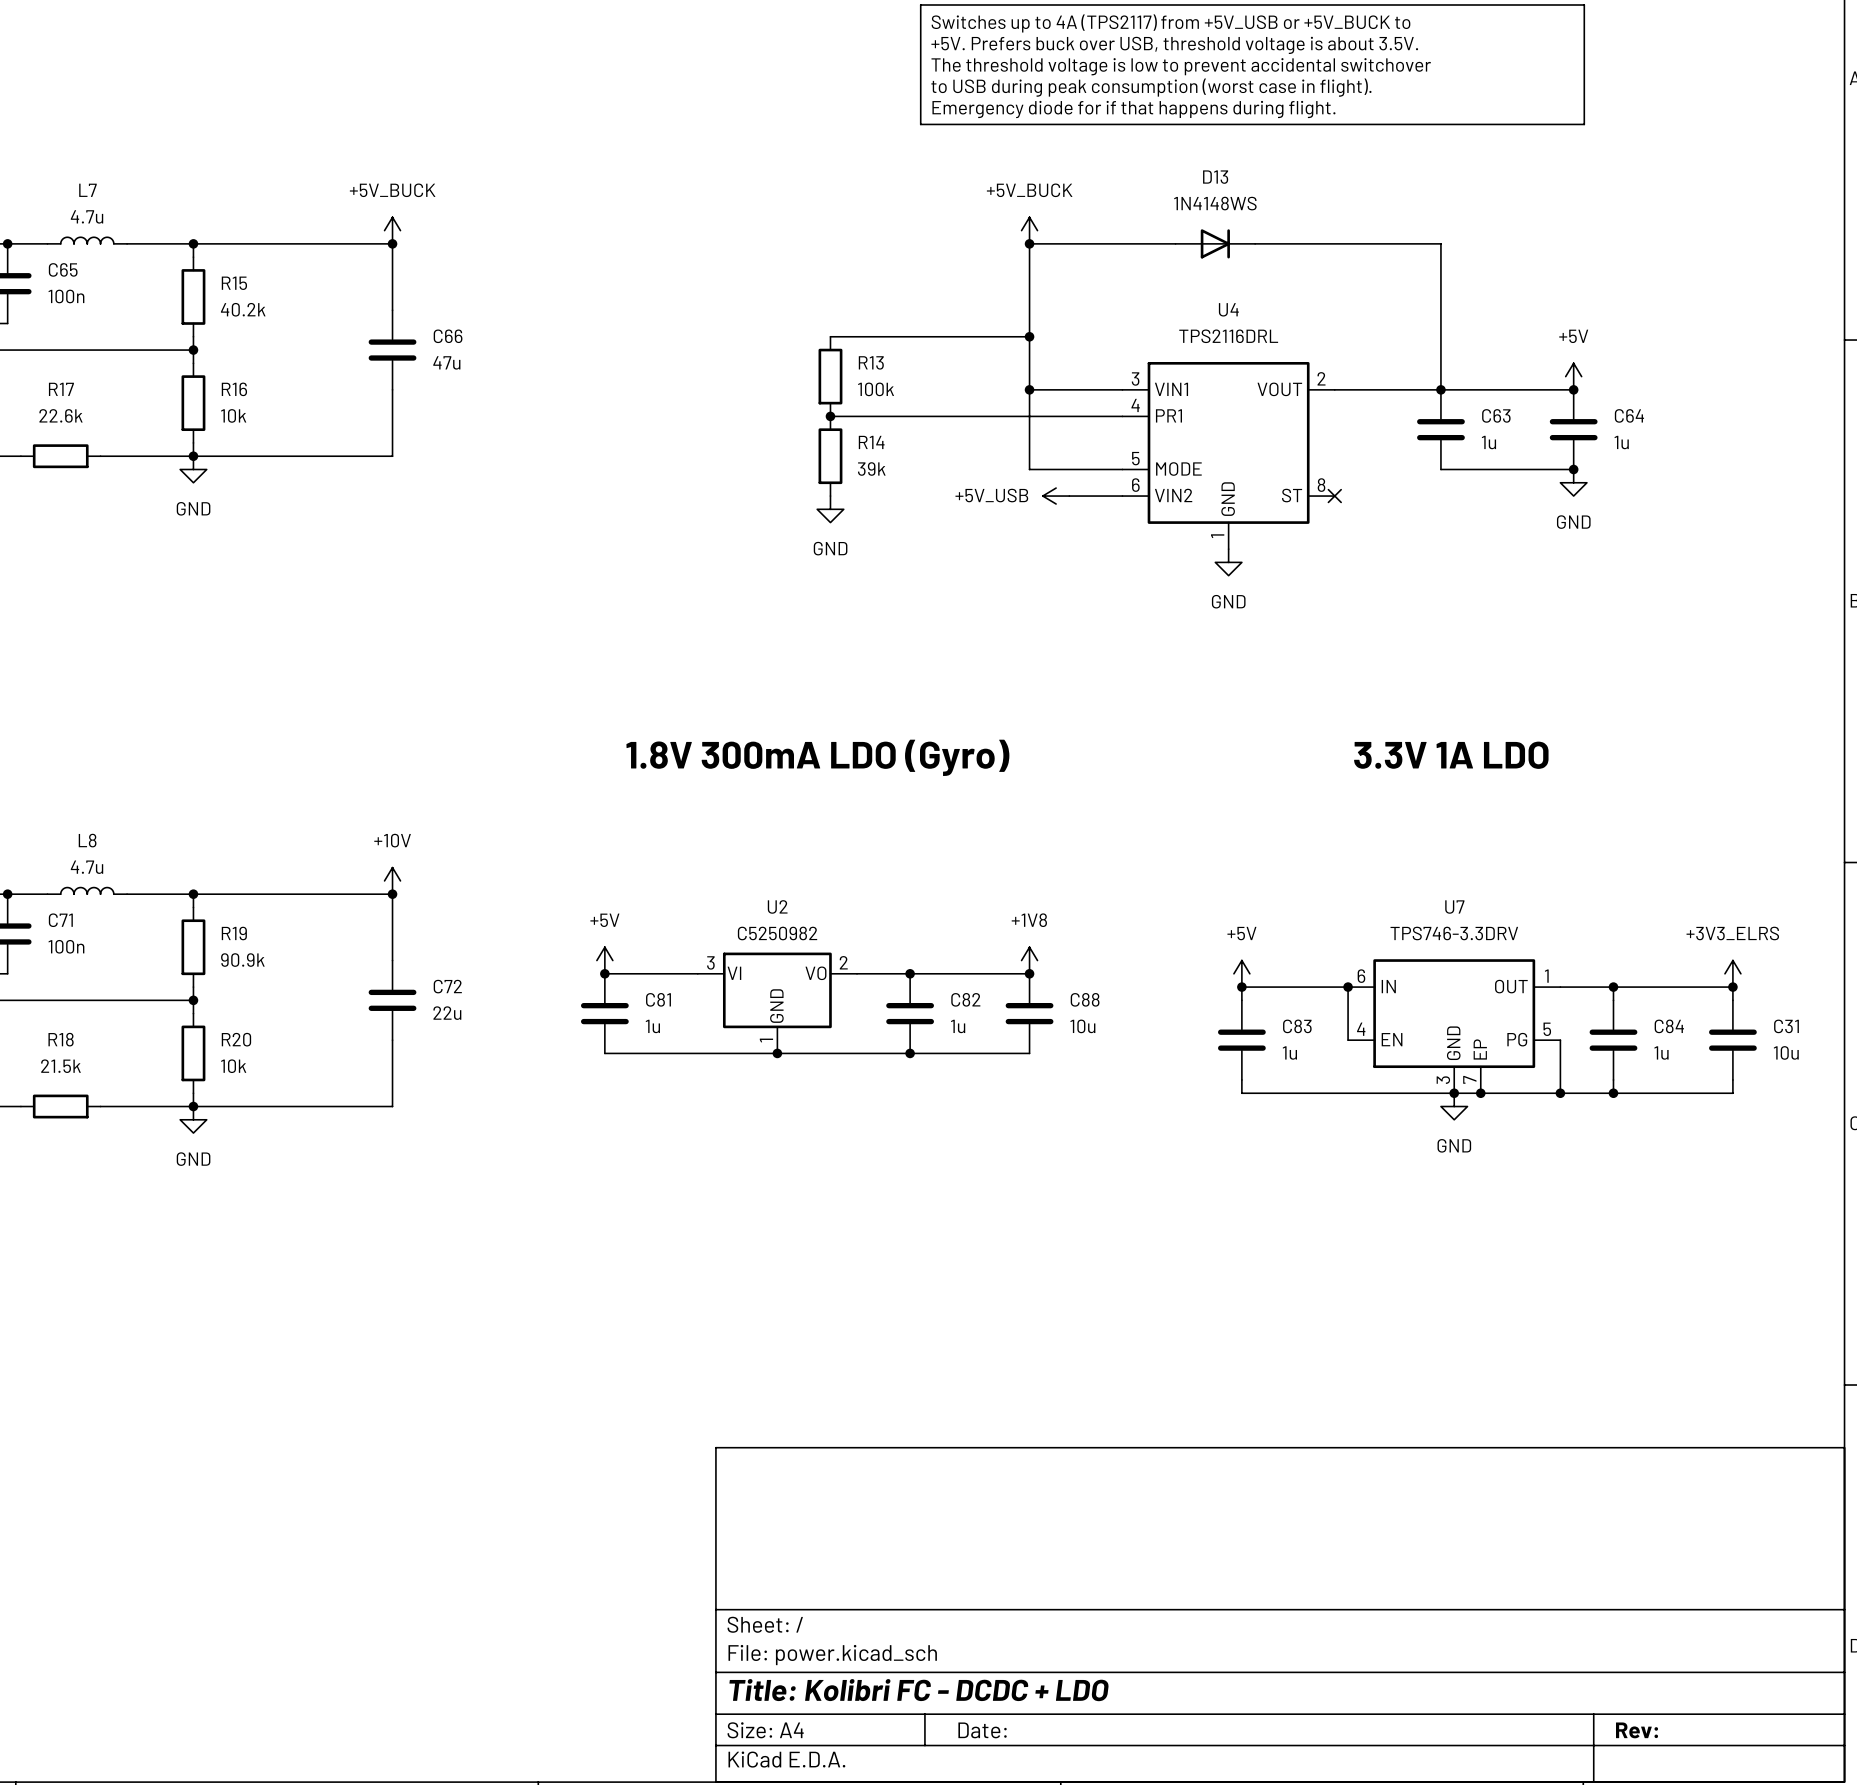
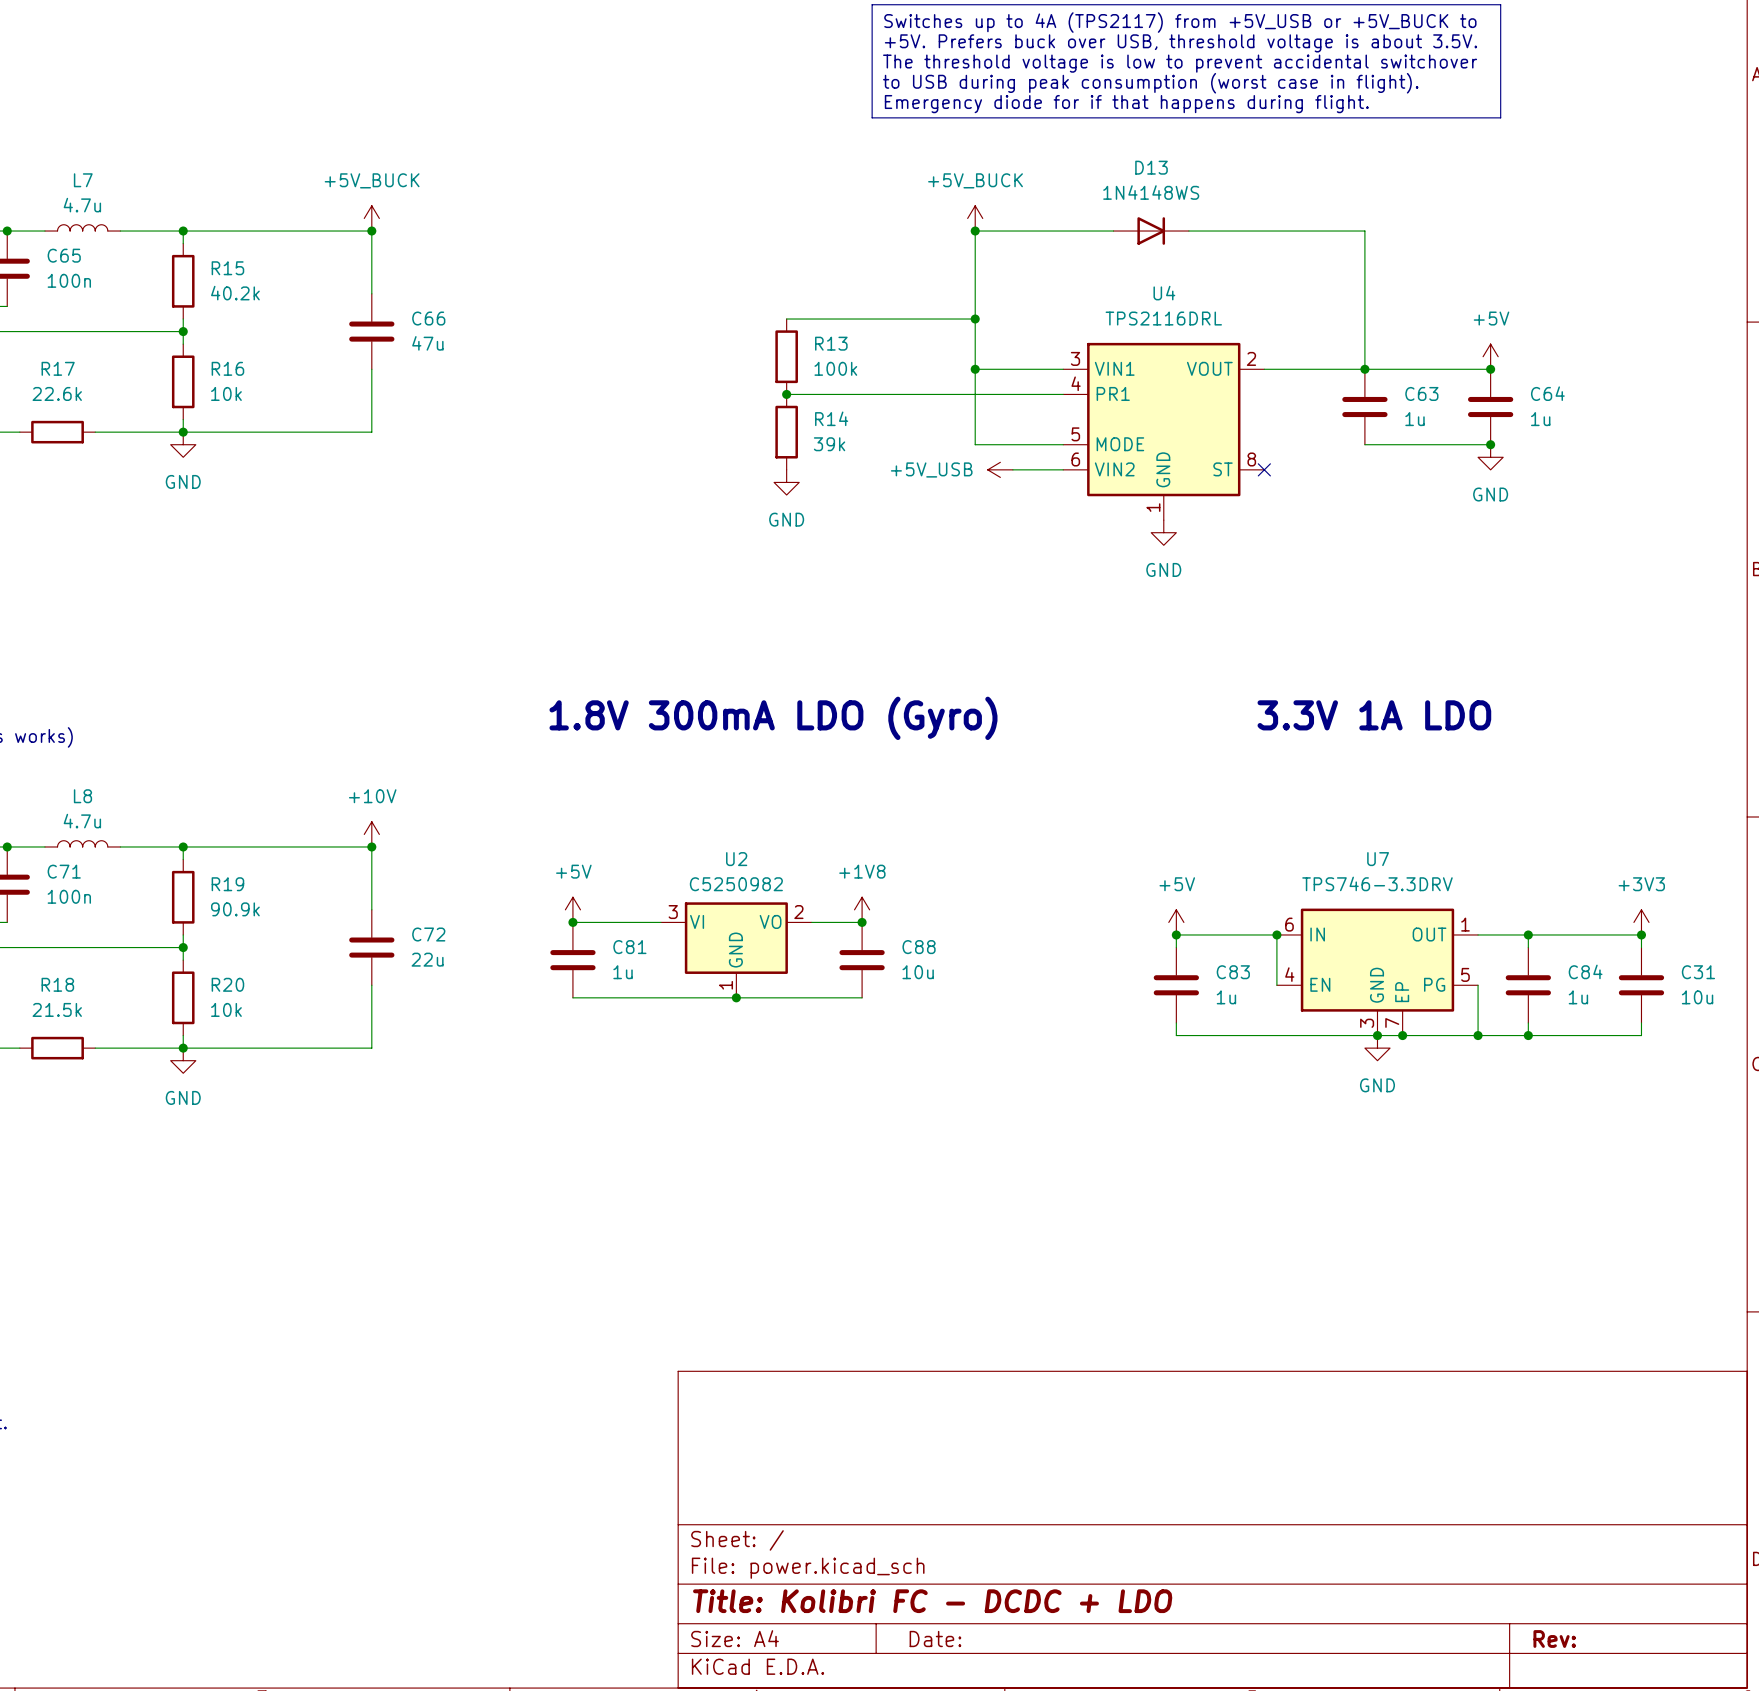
power symbol position: +1V8 (1029, 960) -> +1V8 (862, 909)
wire: (910, 973) (1029, 973) -> none
junction: (1029, 973) -> none
power symbol: +3V3_ELRS (1732, 973) -> +3V3 (1641, 922)
C82 name: C82 (965, 999) -> C88 (919, 947)
C88: 10u (1029, 1013) -> none
C82 value: 1u (958, 1026) -> 10u (918, 972)
wire: (910, 1053) (1029, 1053) -> none
junction: (910, 1053) -> none

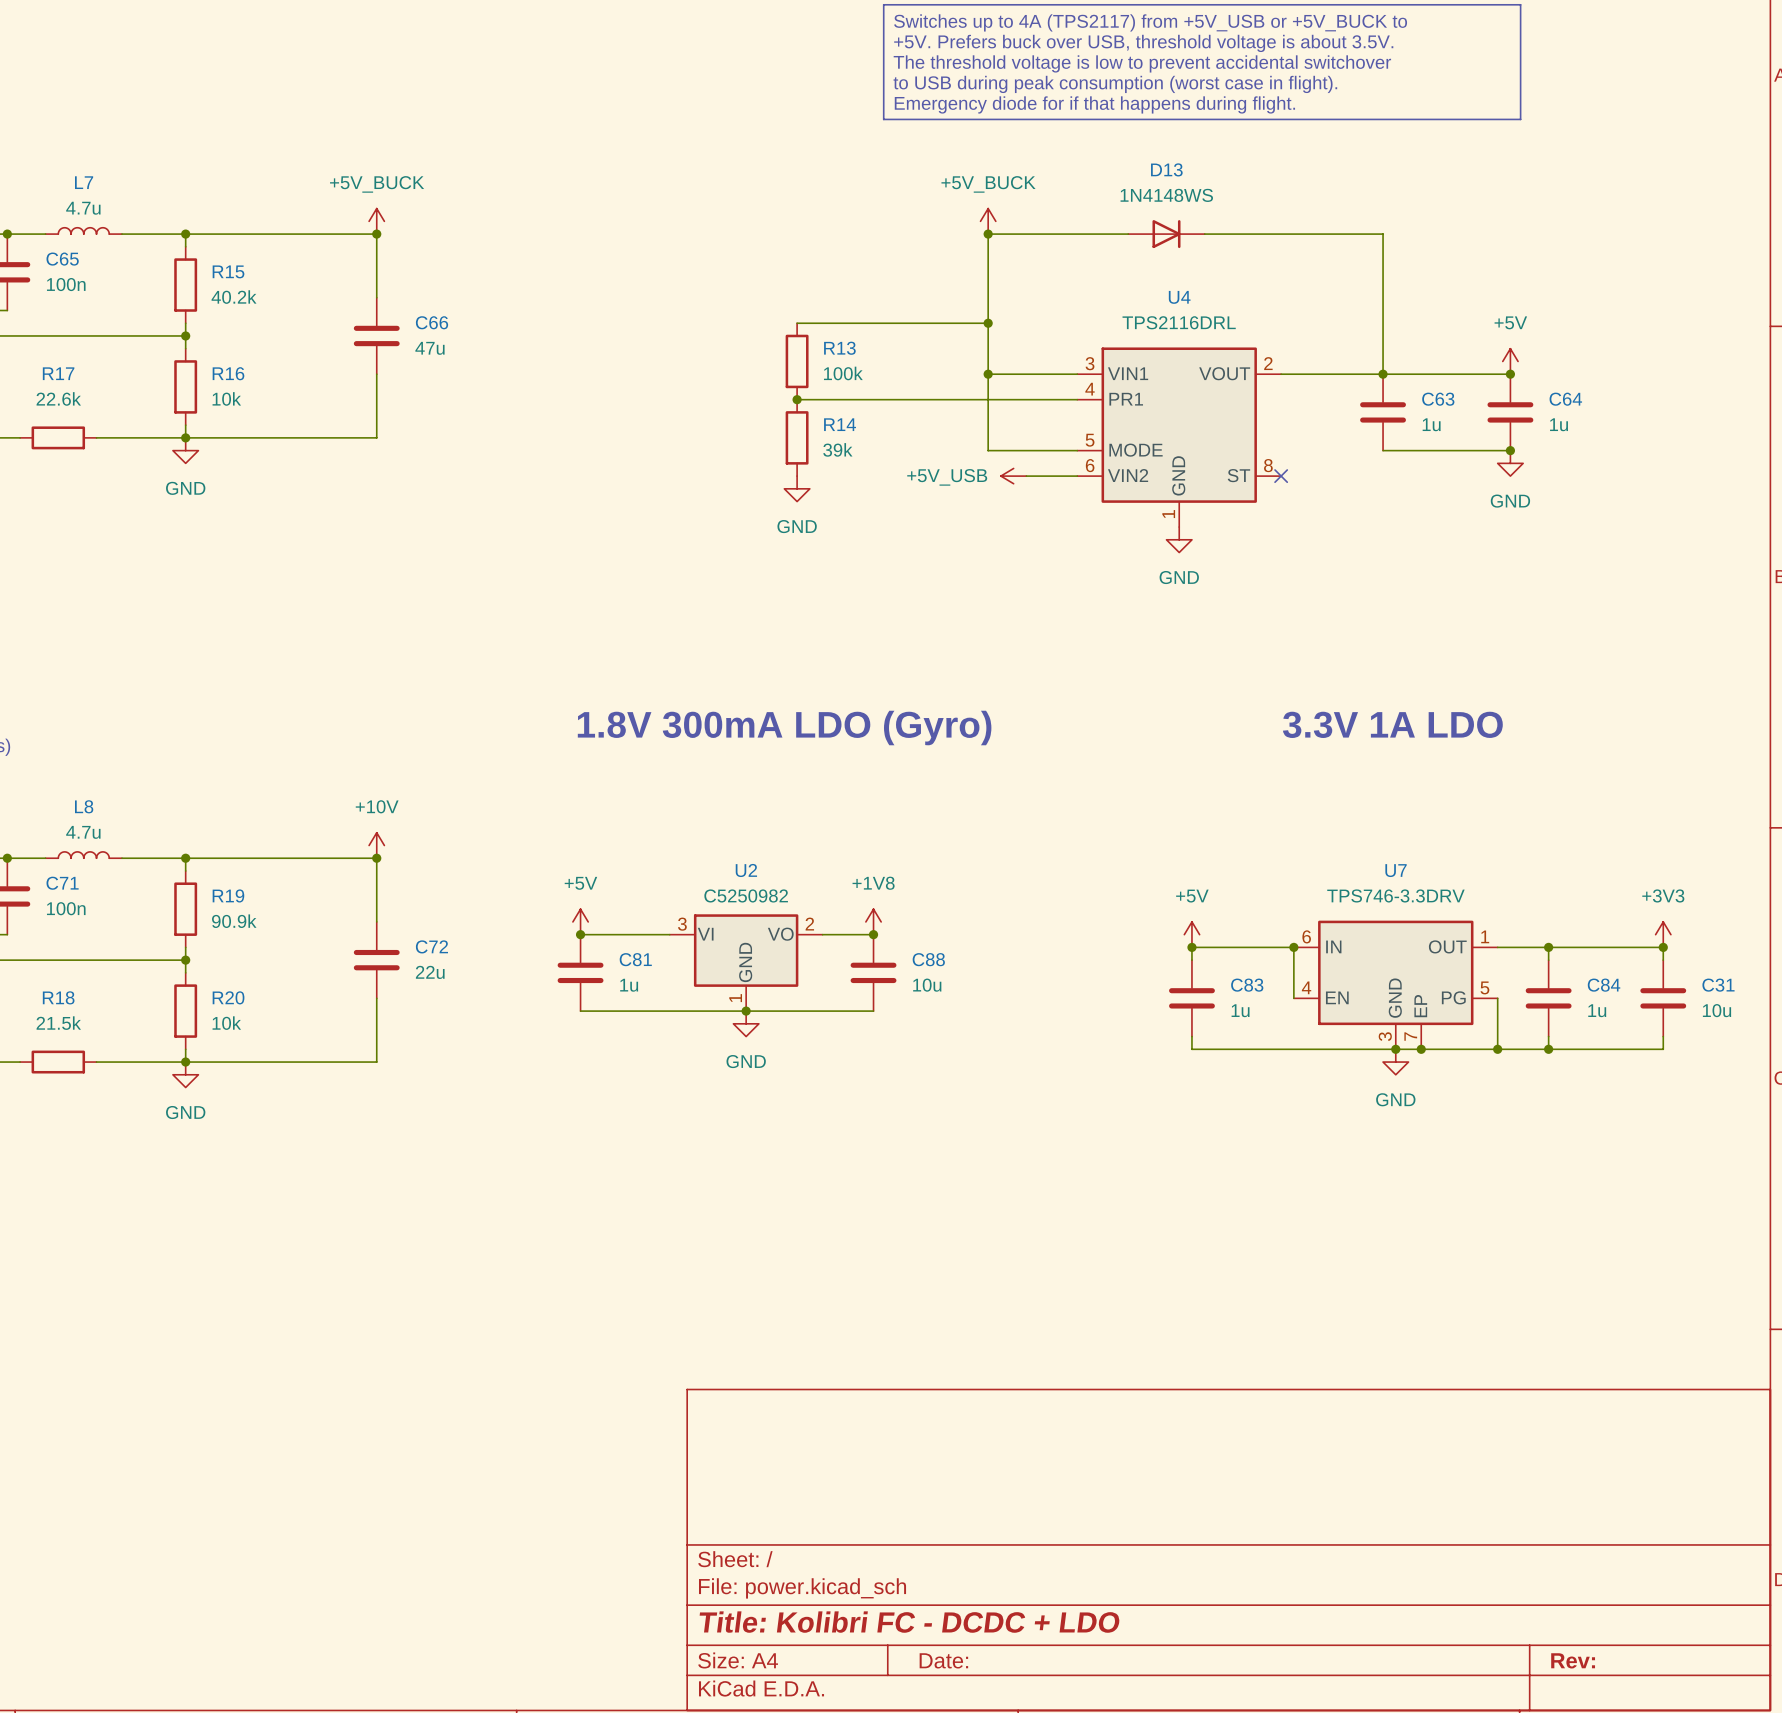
power symbol: none -> GND (746, 1023)

